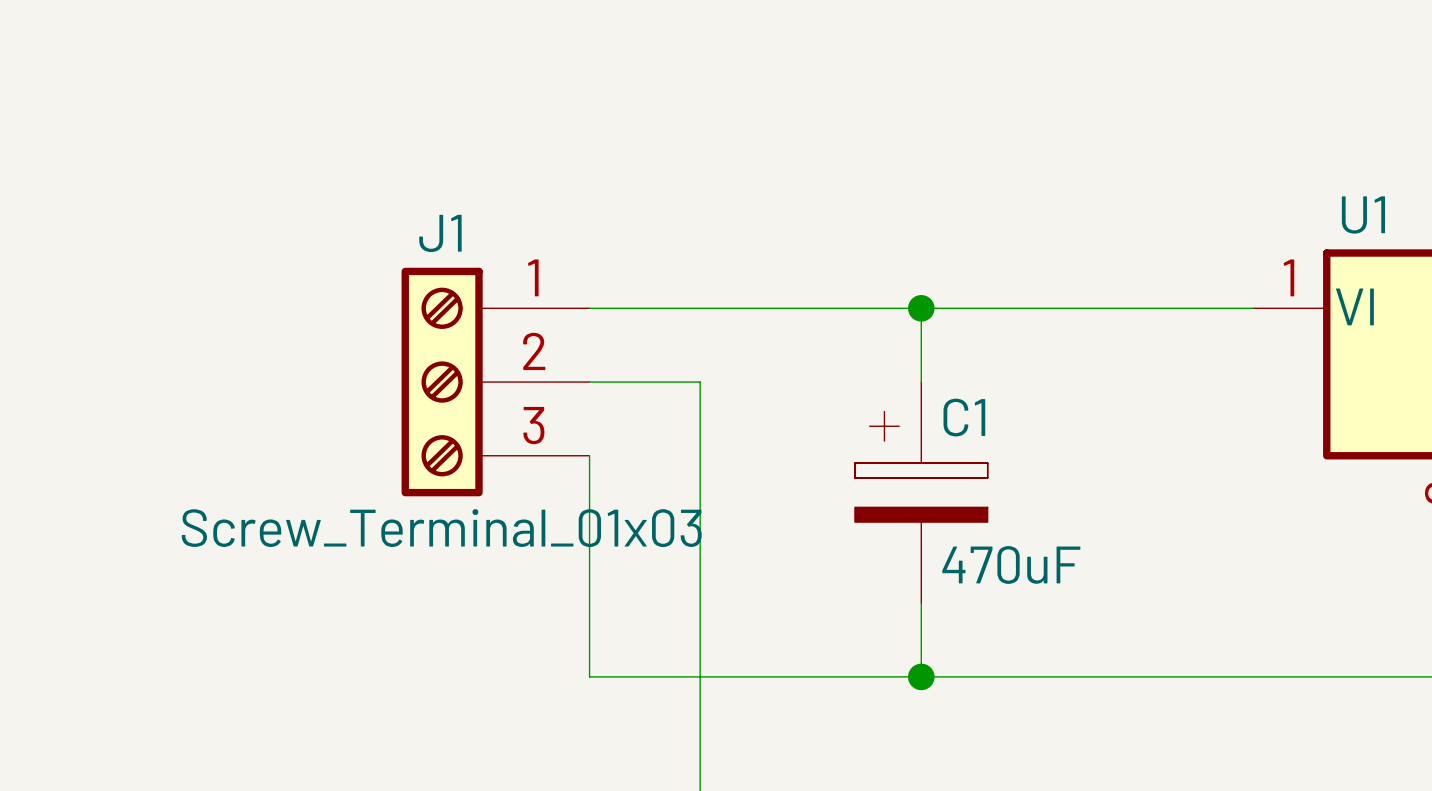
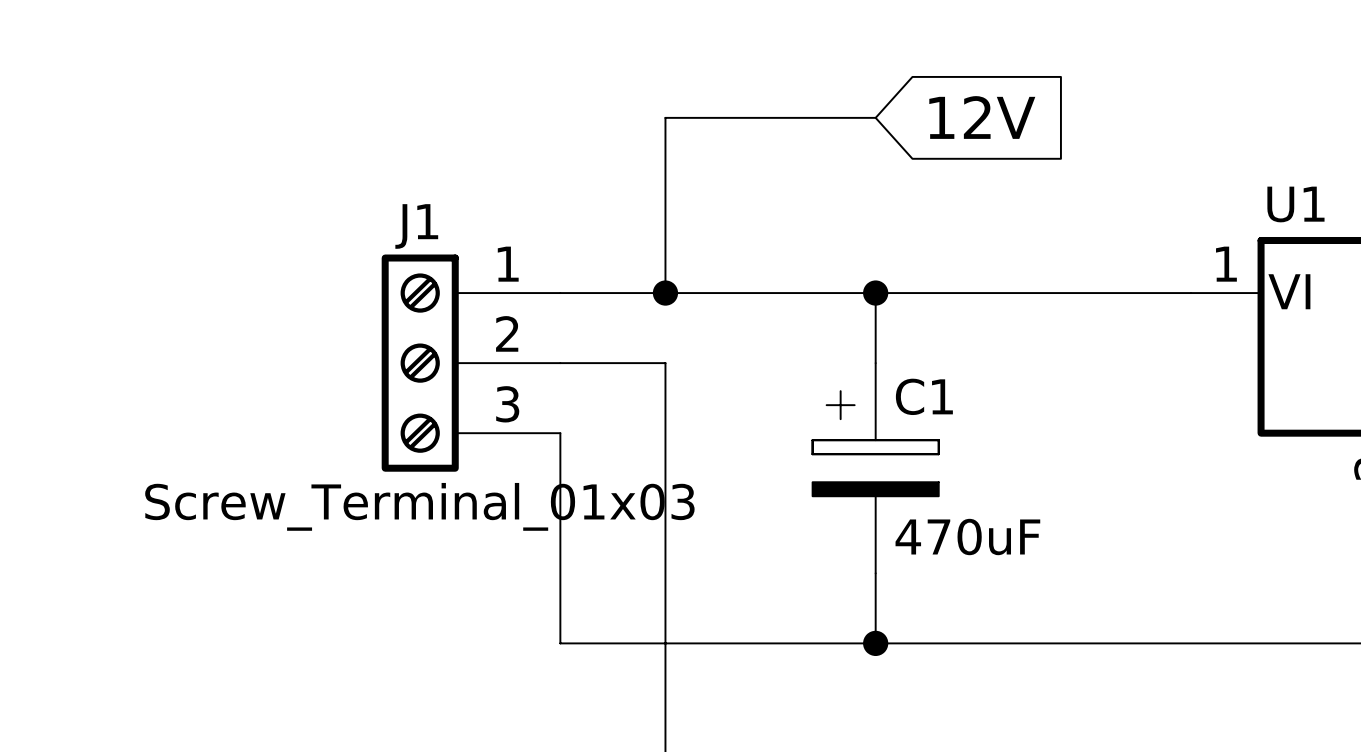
global label: none -> 12V (982, 117)
wire: none -> (875, 117) (665, 117) (665, 293)
junction: none -> (665, 293)

